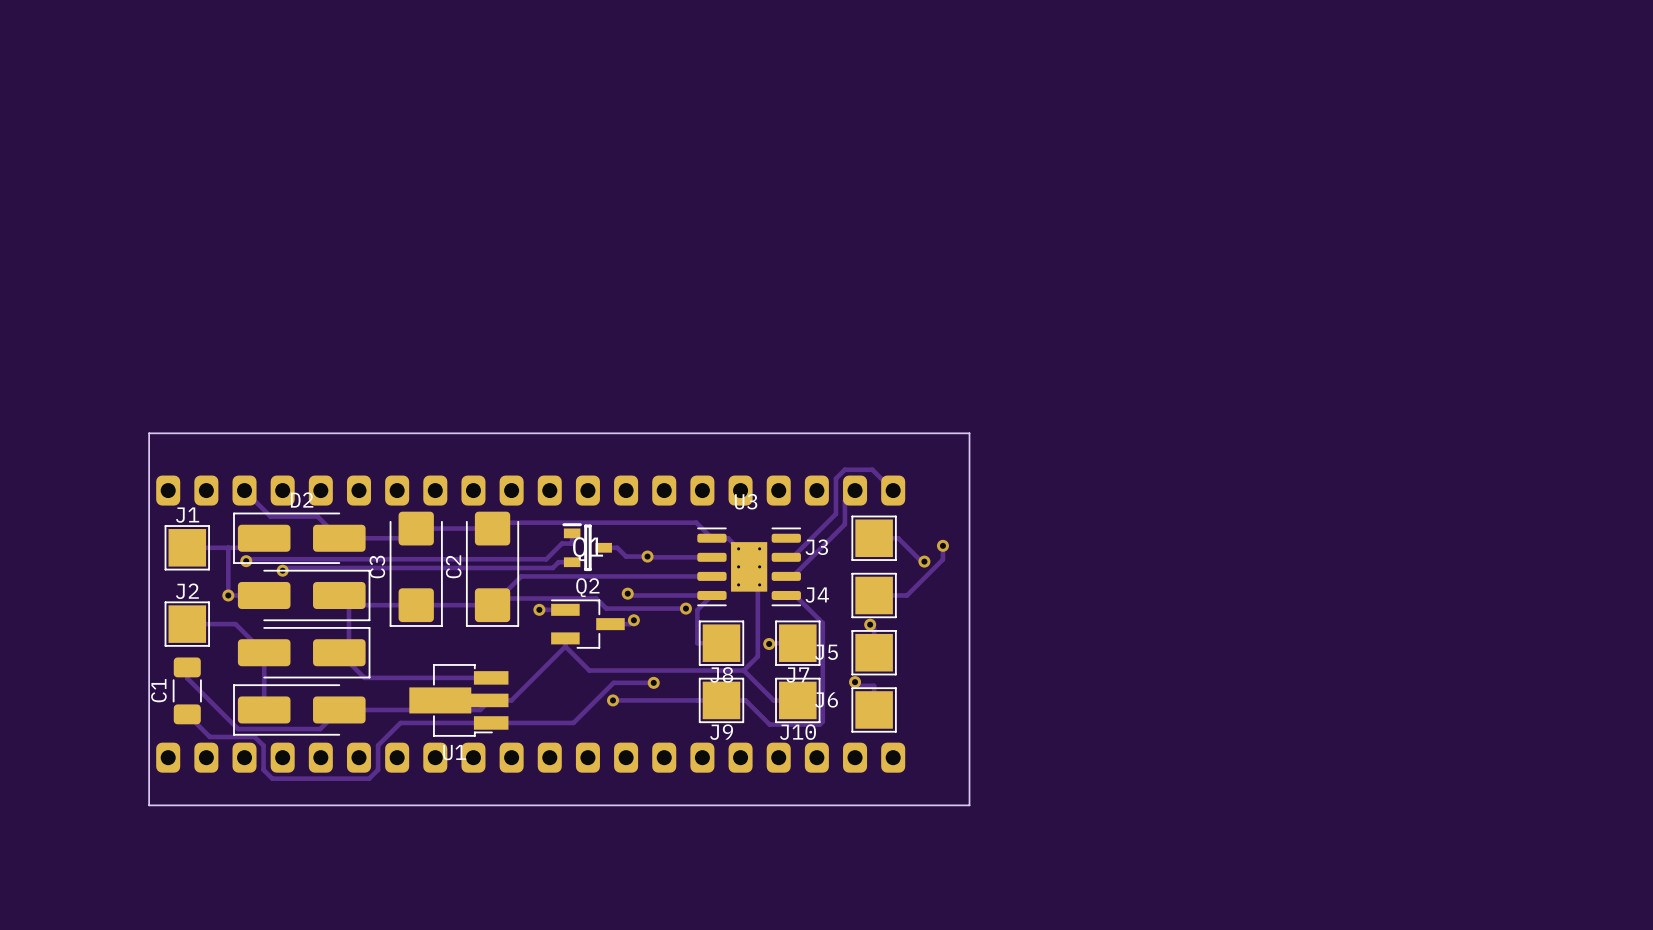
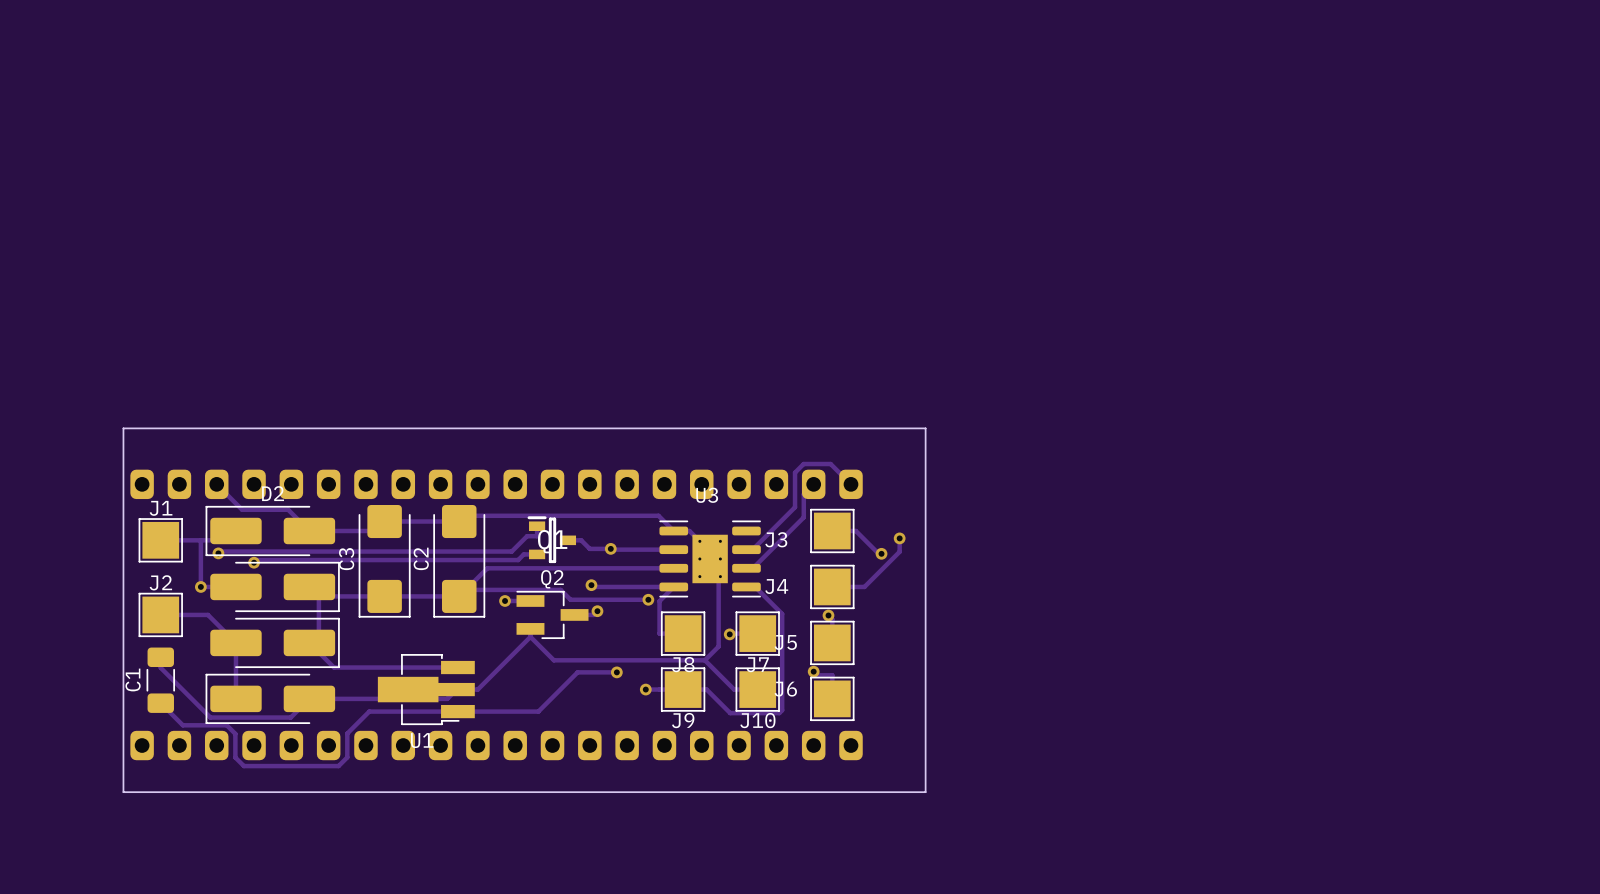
track: (613, 700) (683, 700) -> none
via position: (613, 700) -> (645, 689)

